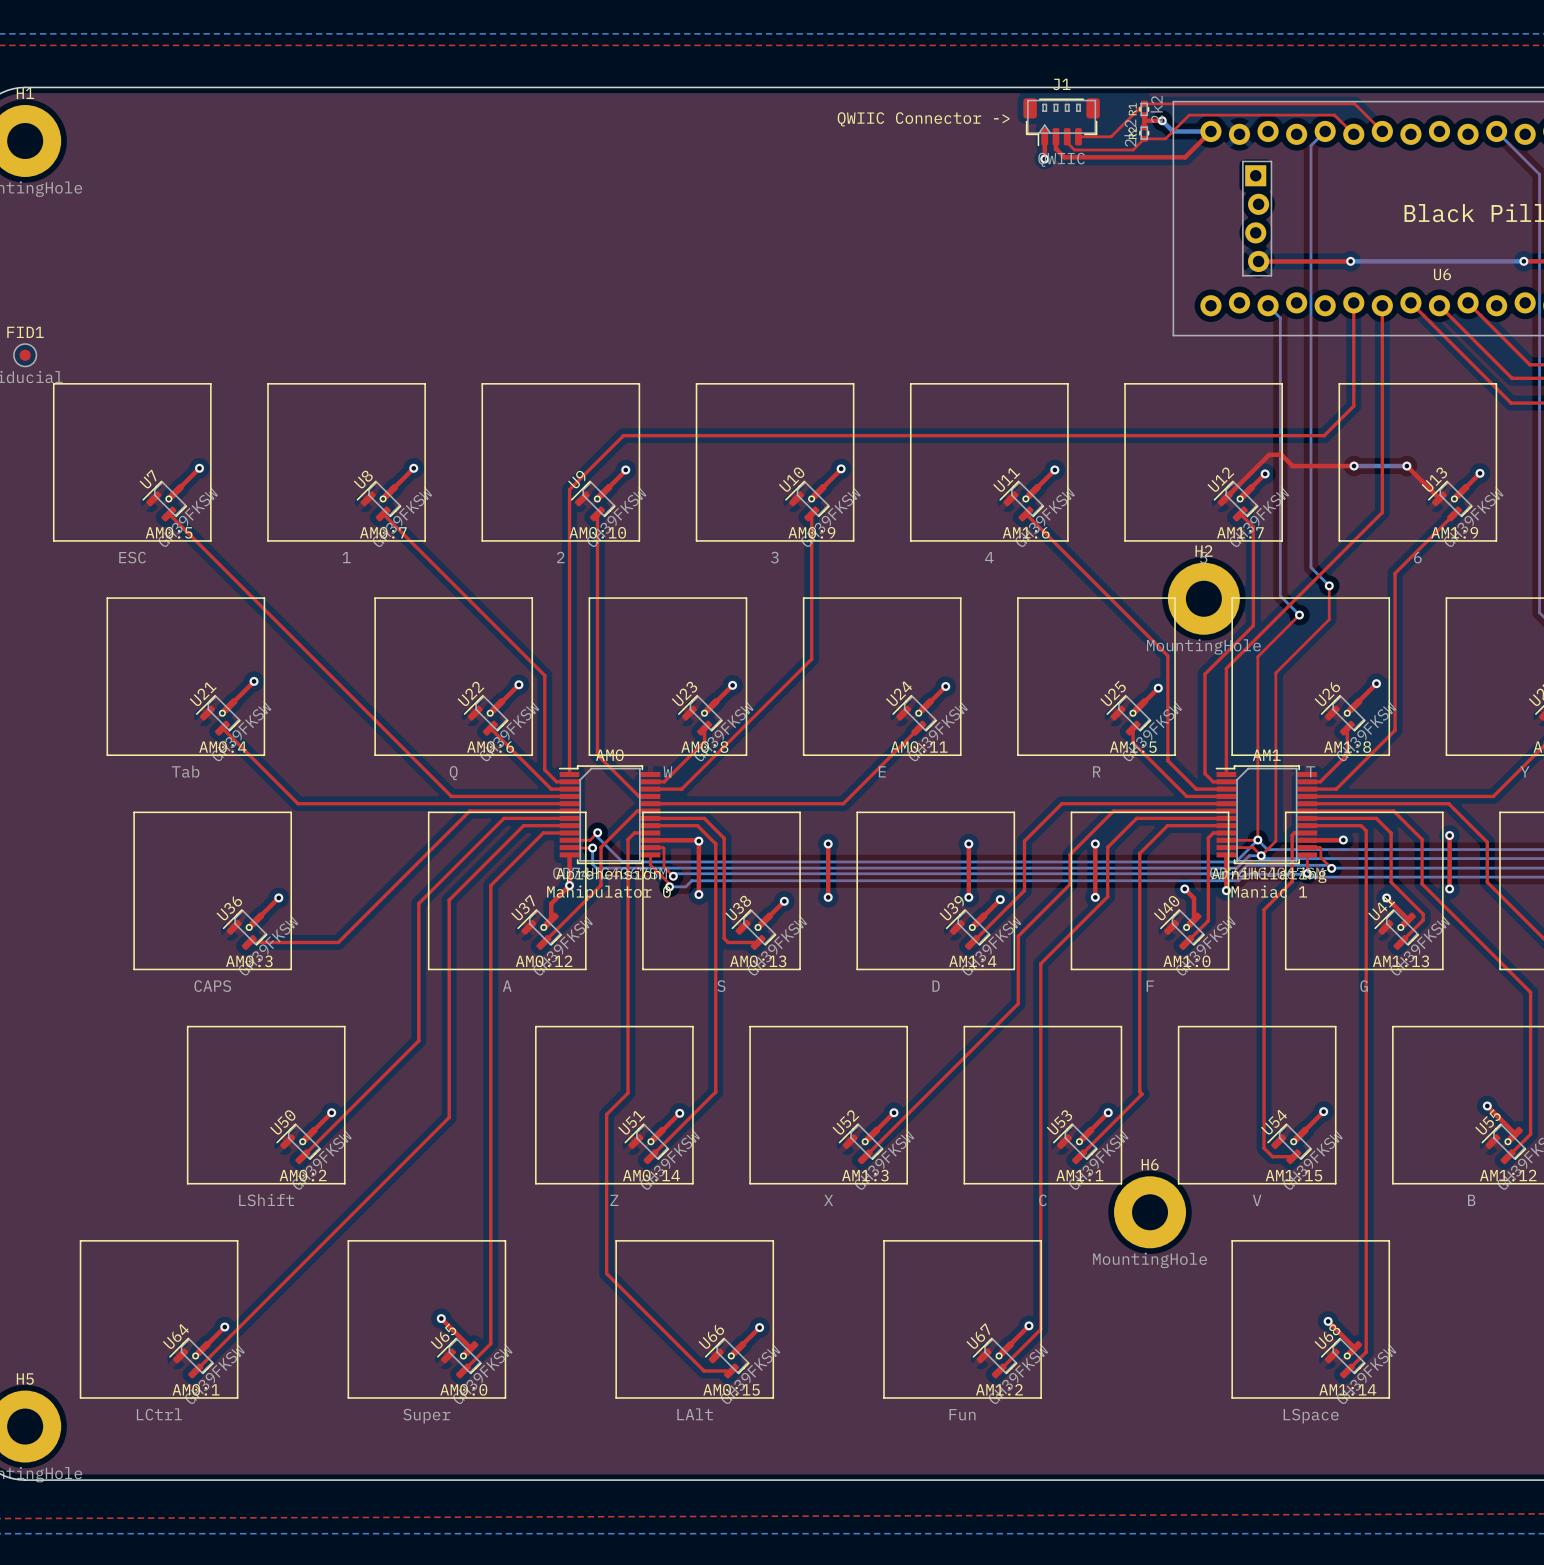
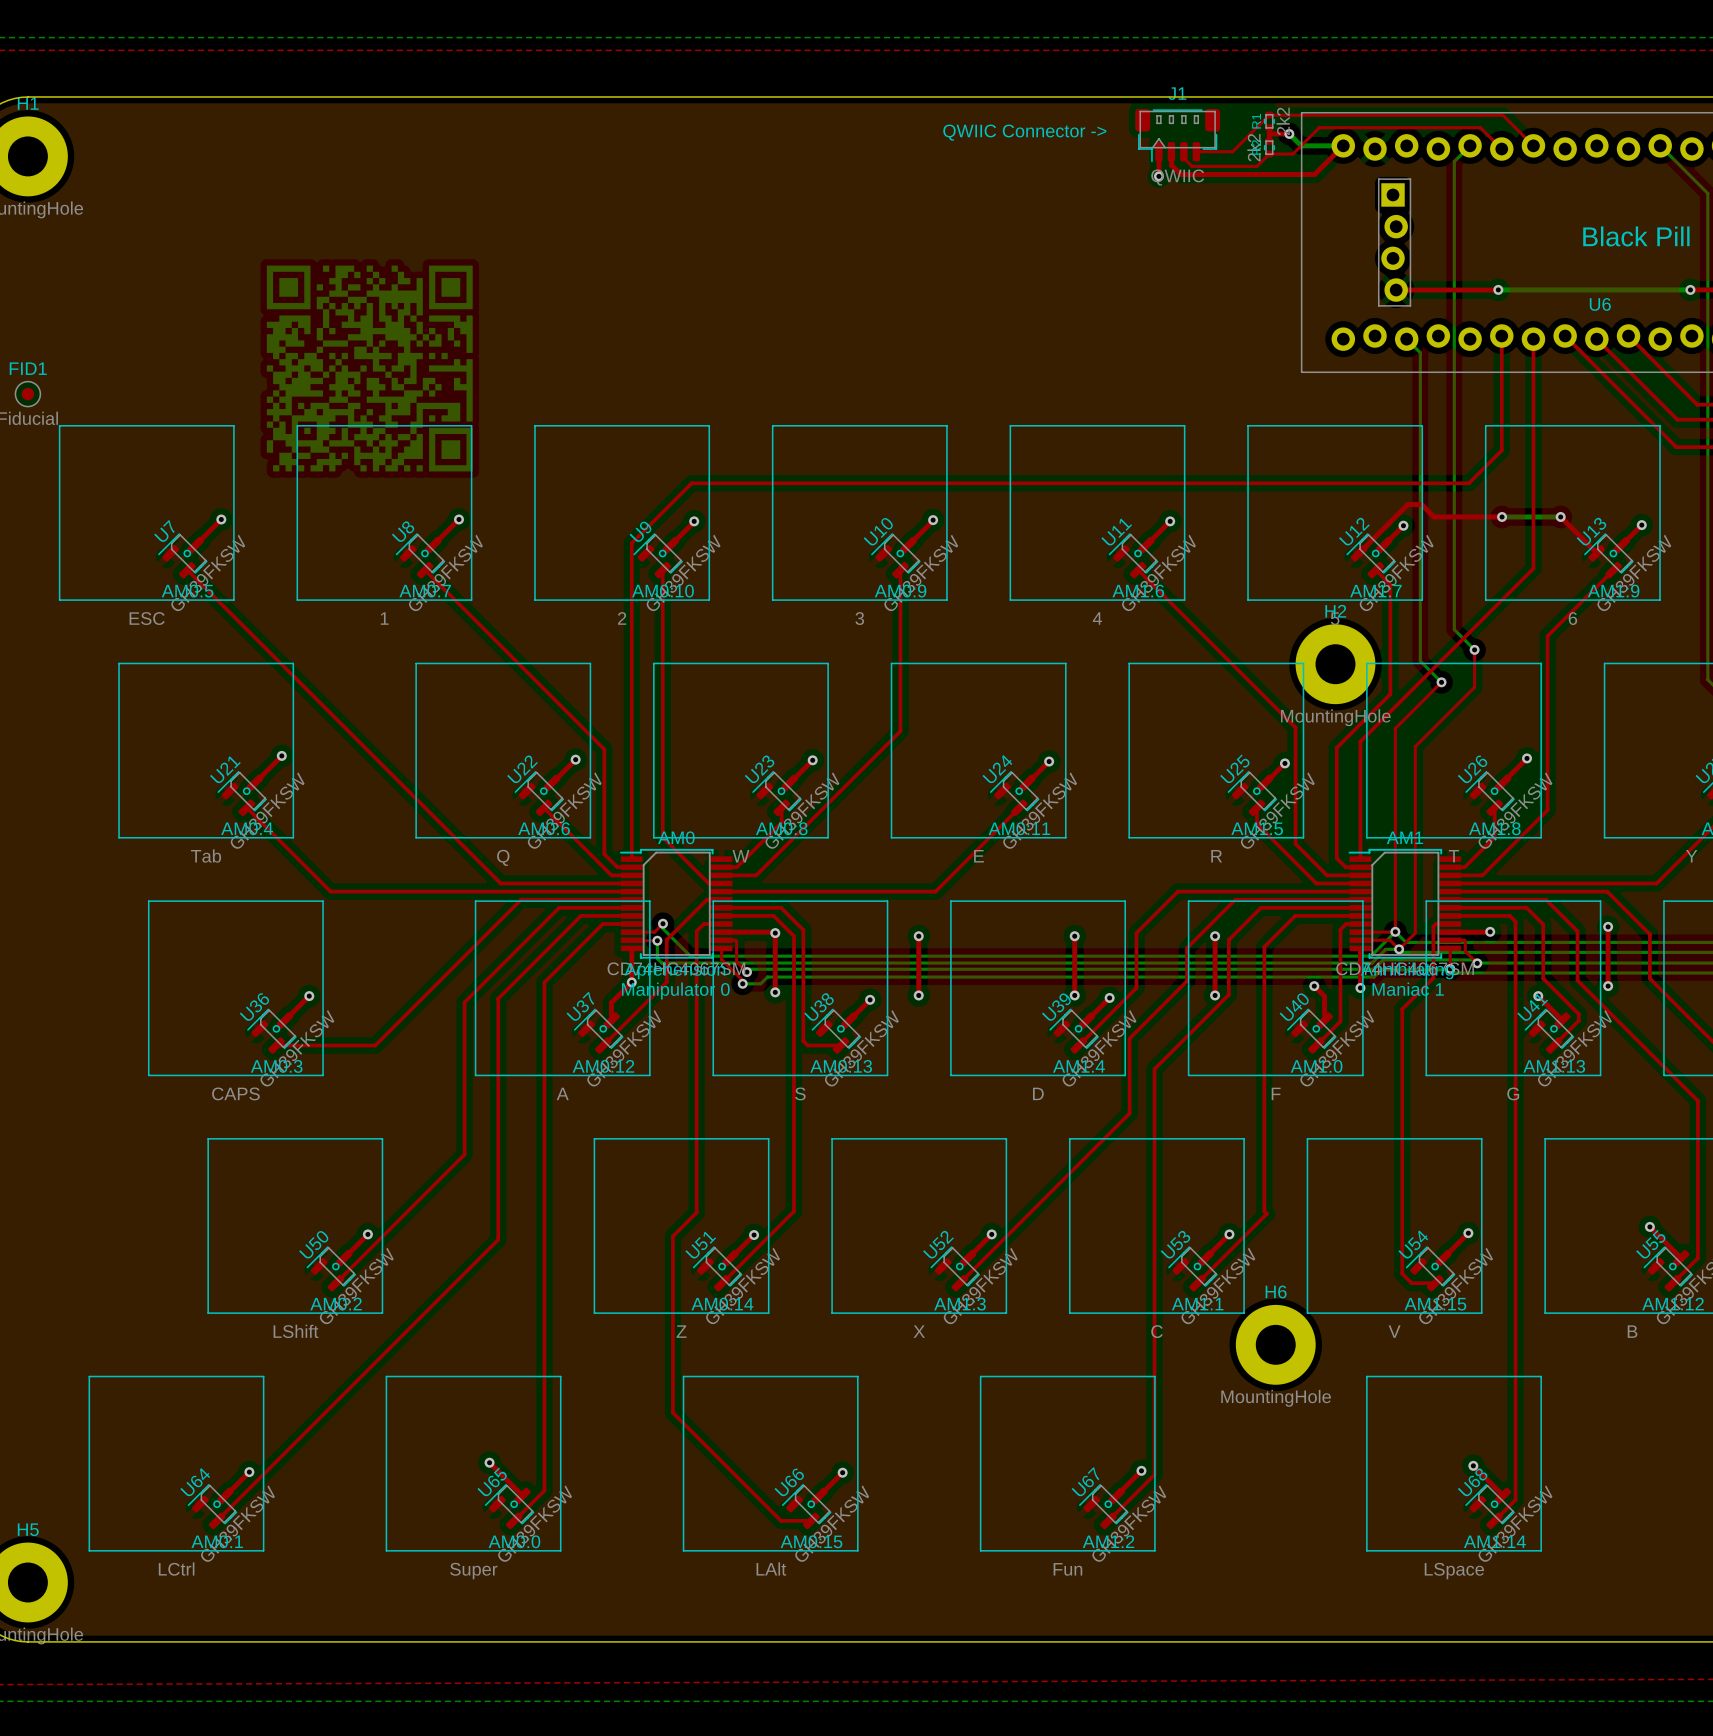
part: none -> (369, 368)

